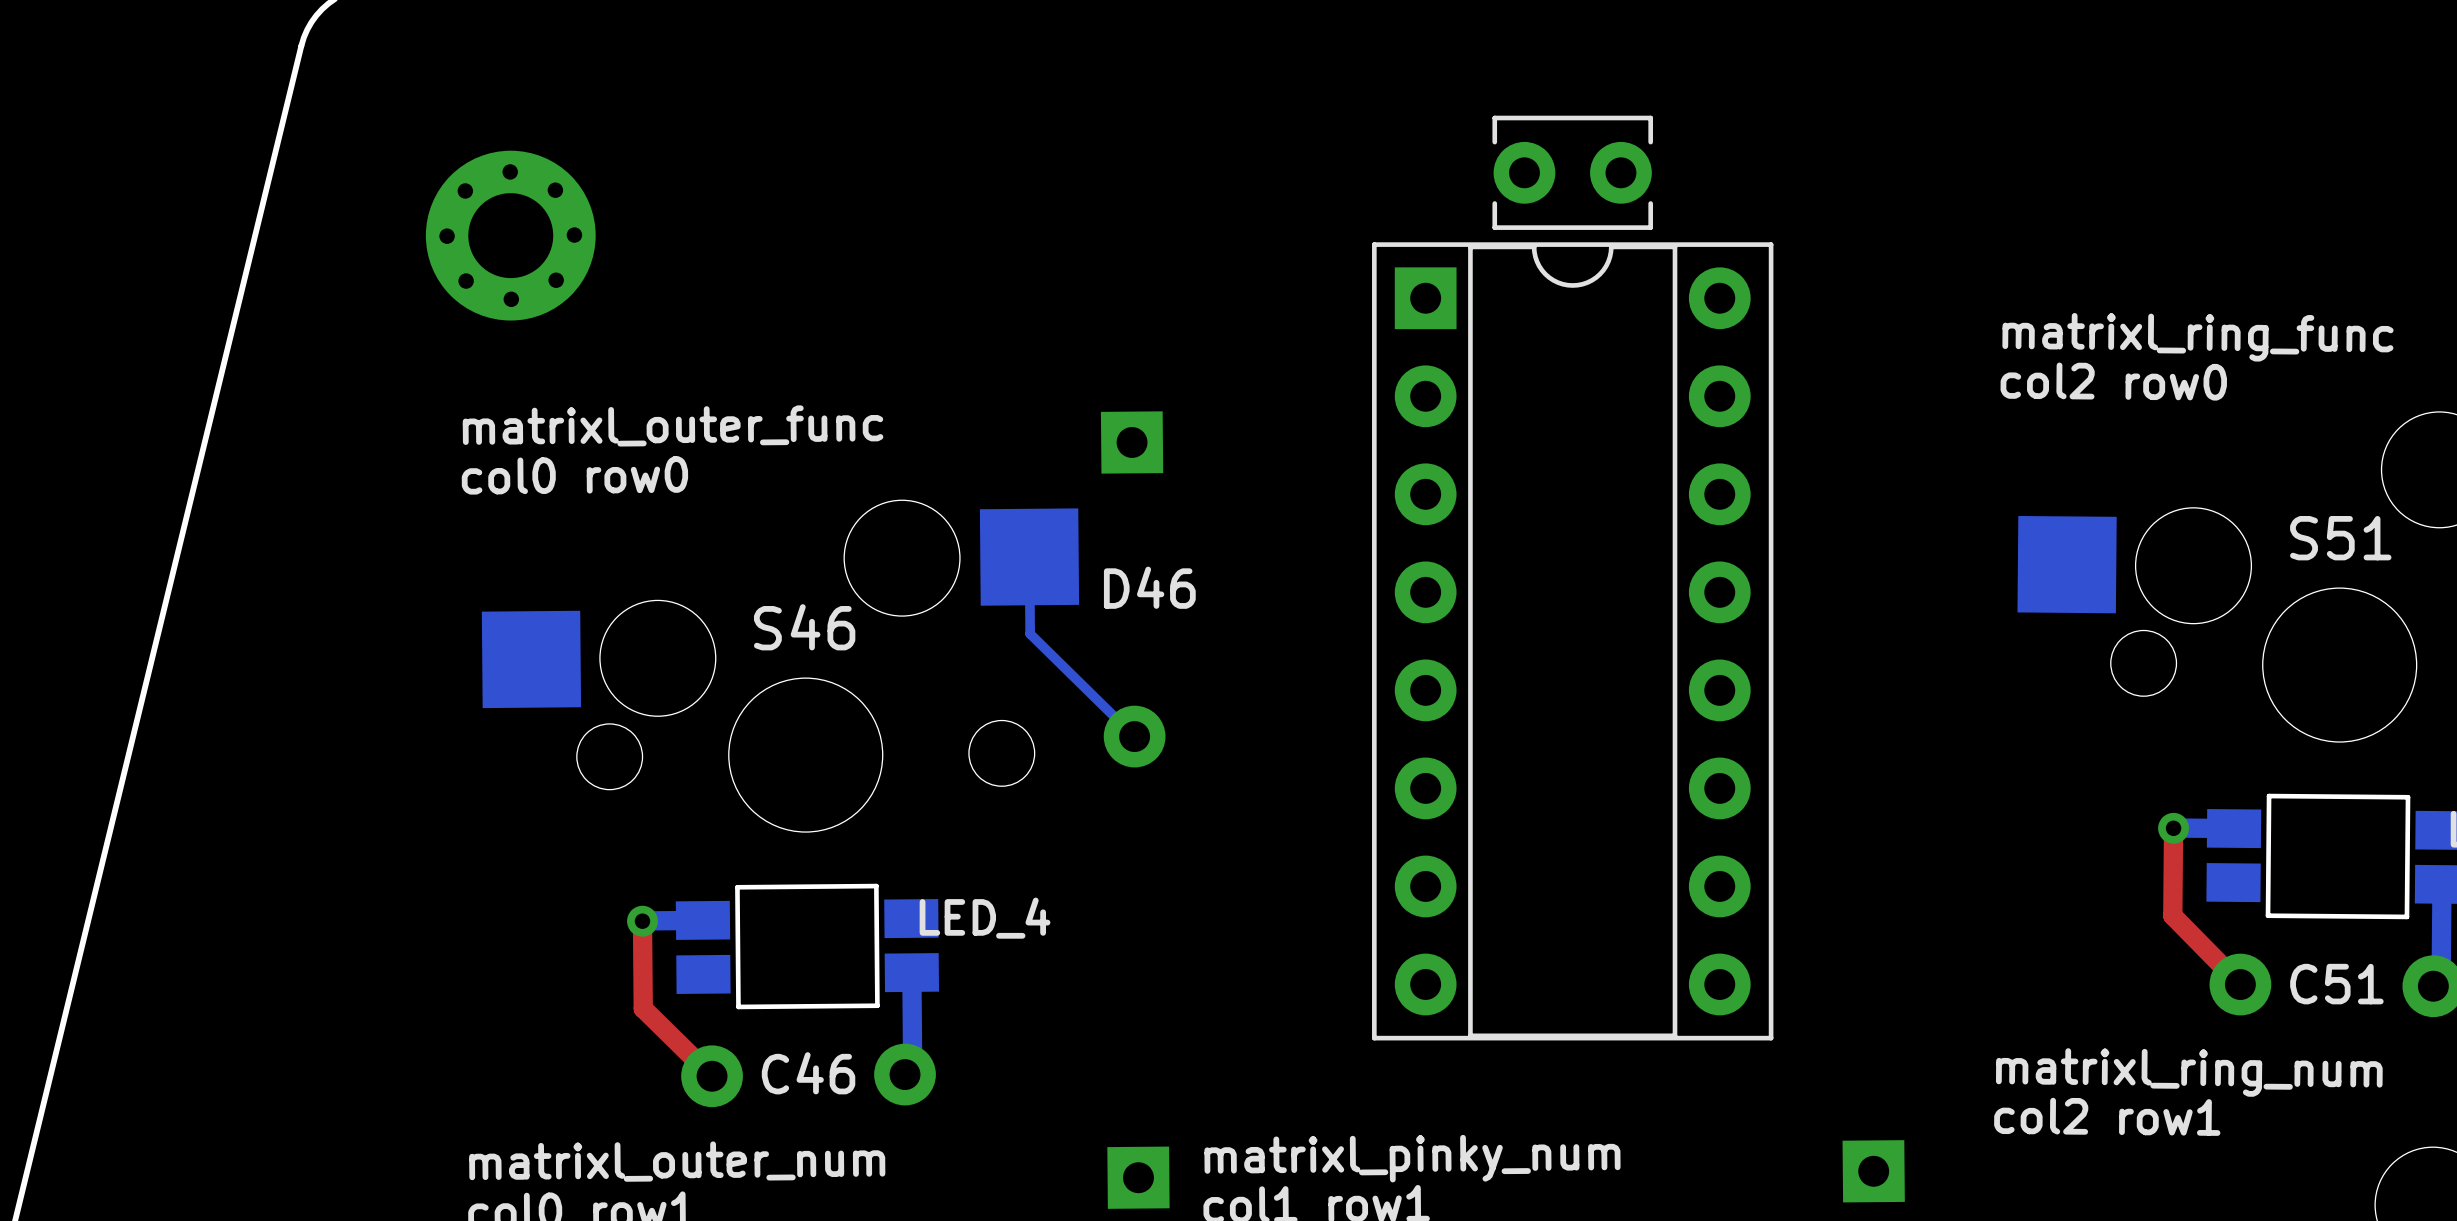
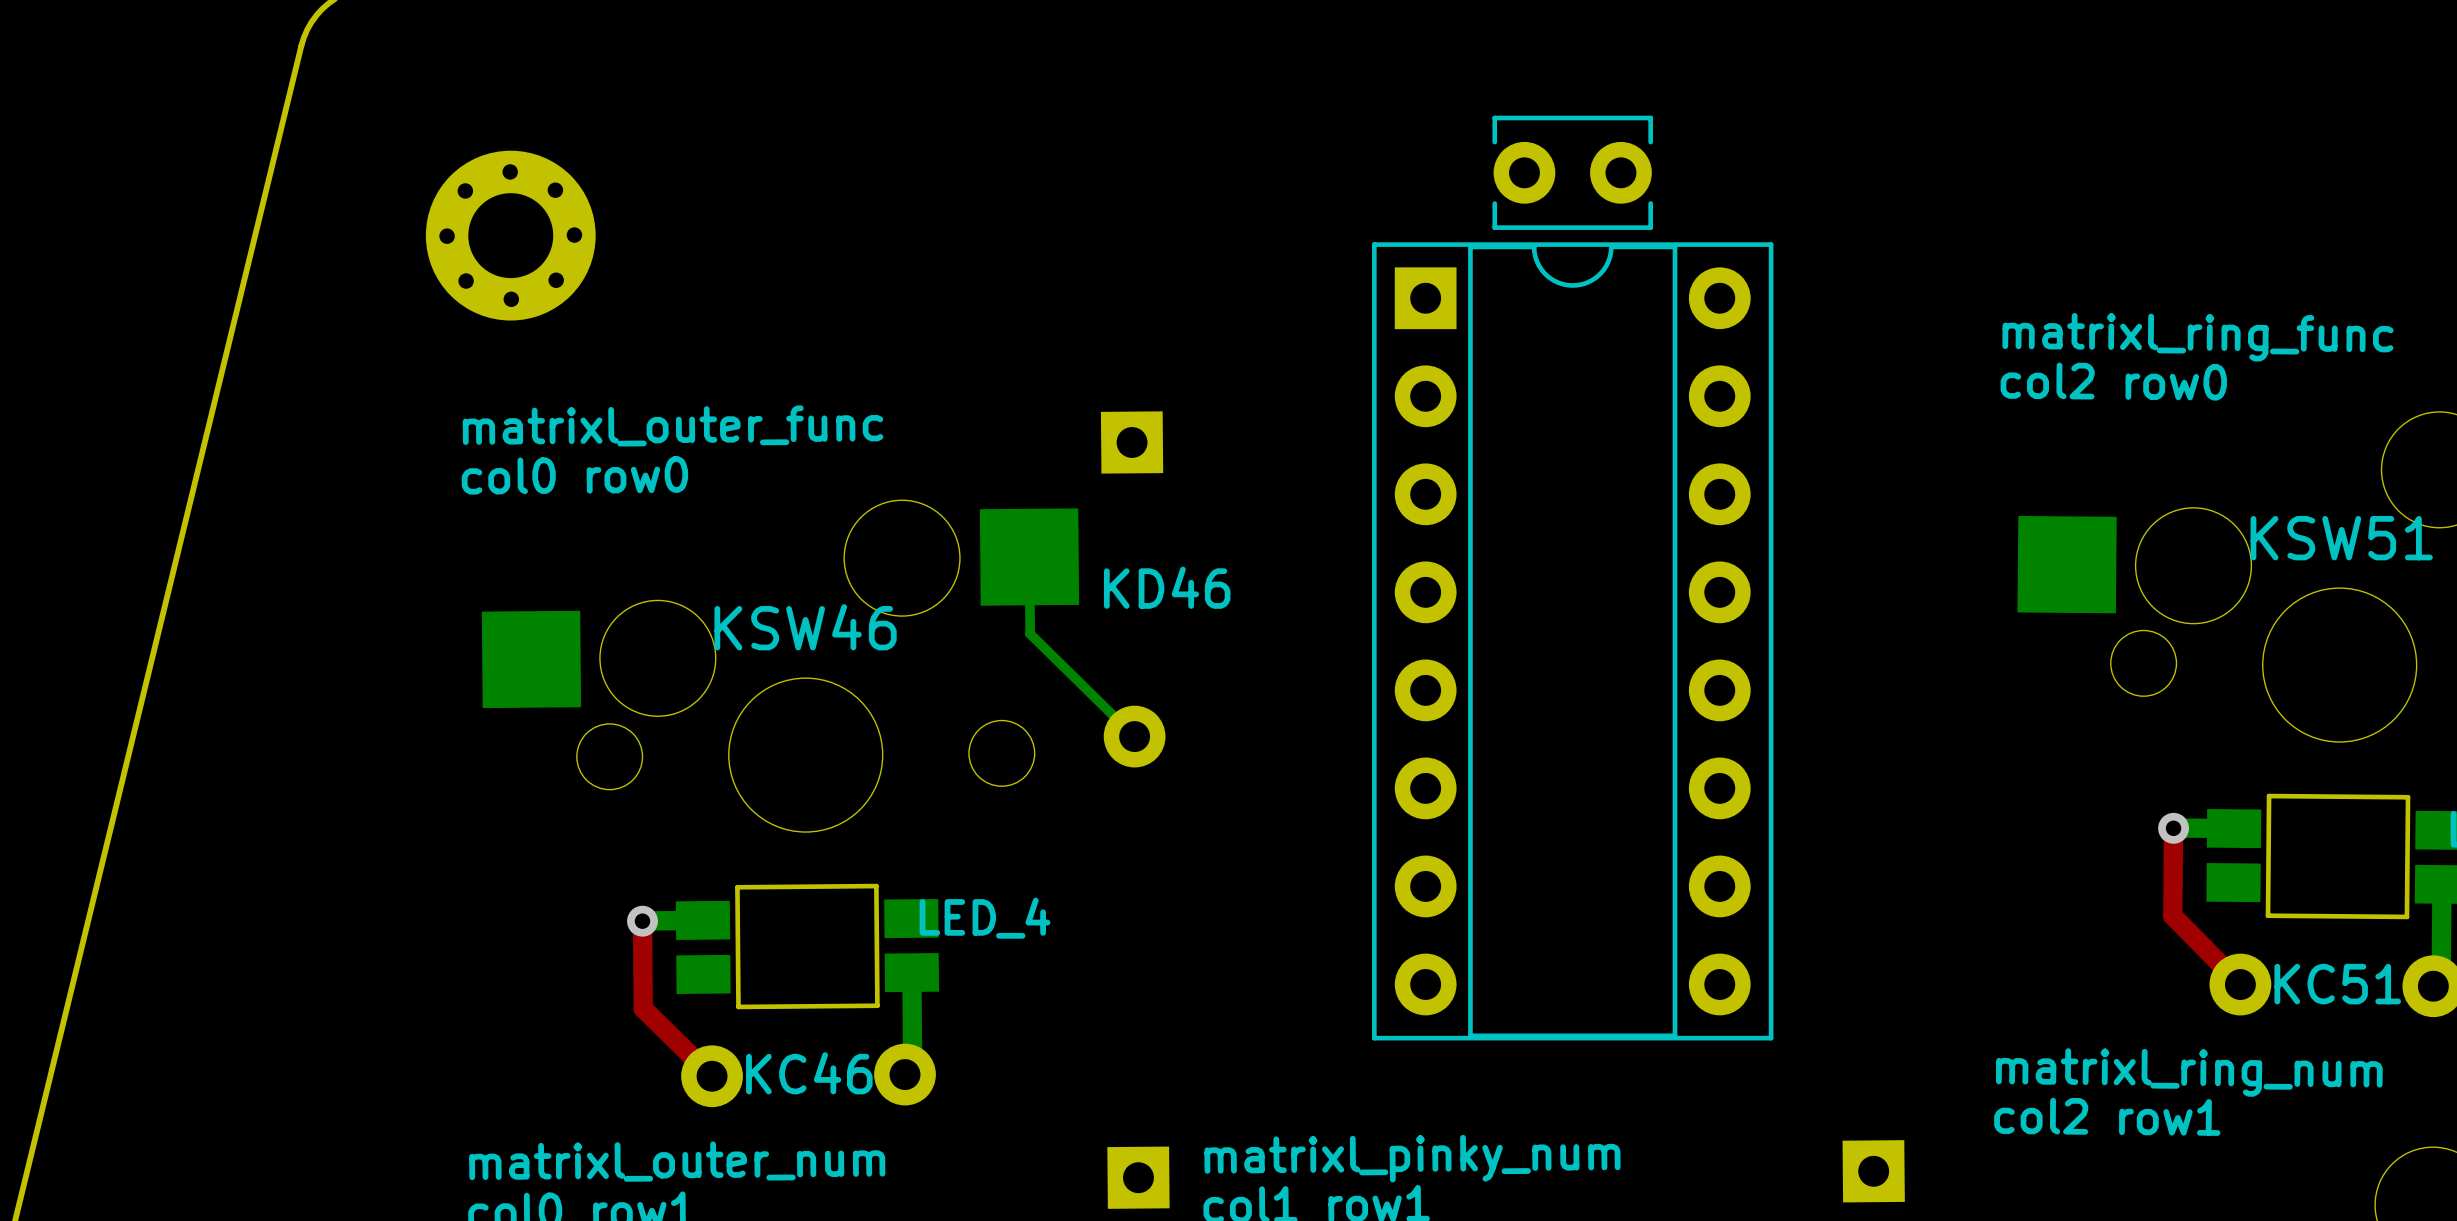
S51 name: S51 (2340, 538) -> KSW51 (2341, 538)
text: D46 (1149, 587) -> KD46 (1167, 587)
S46 name: S46 (804, 627) -> KSW46 (805, 627)
text: C51 (2336, 984) -> KC51 (2337, 984)
text: C46 (808, 1073) -> KC46 (809, 1073)

